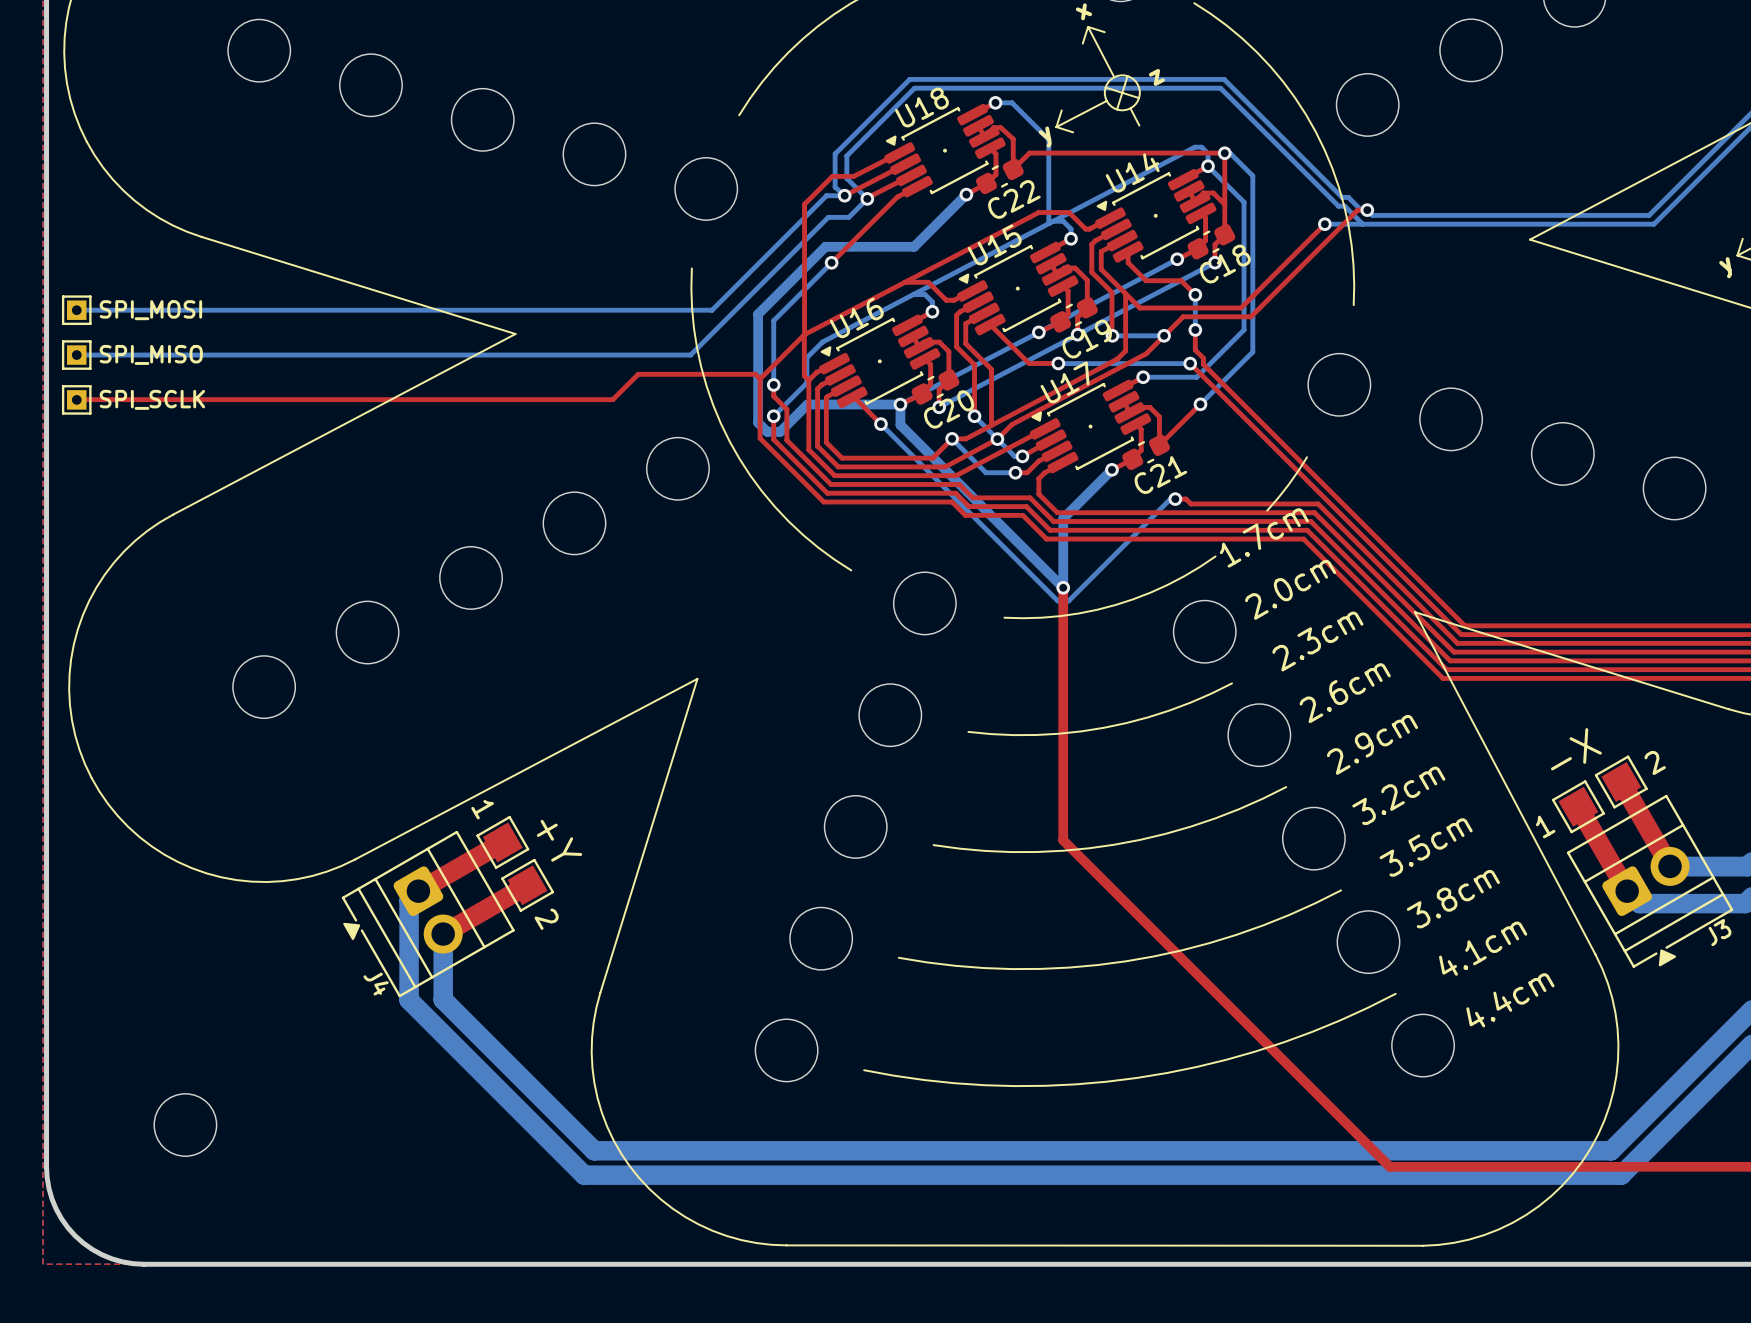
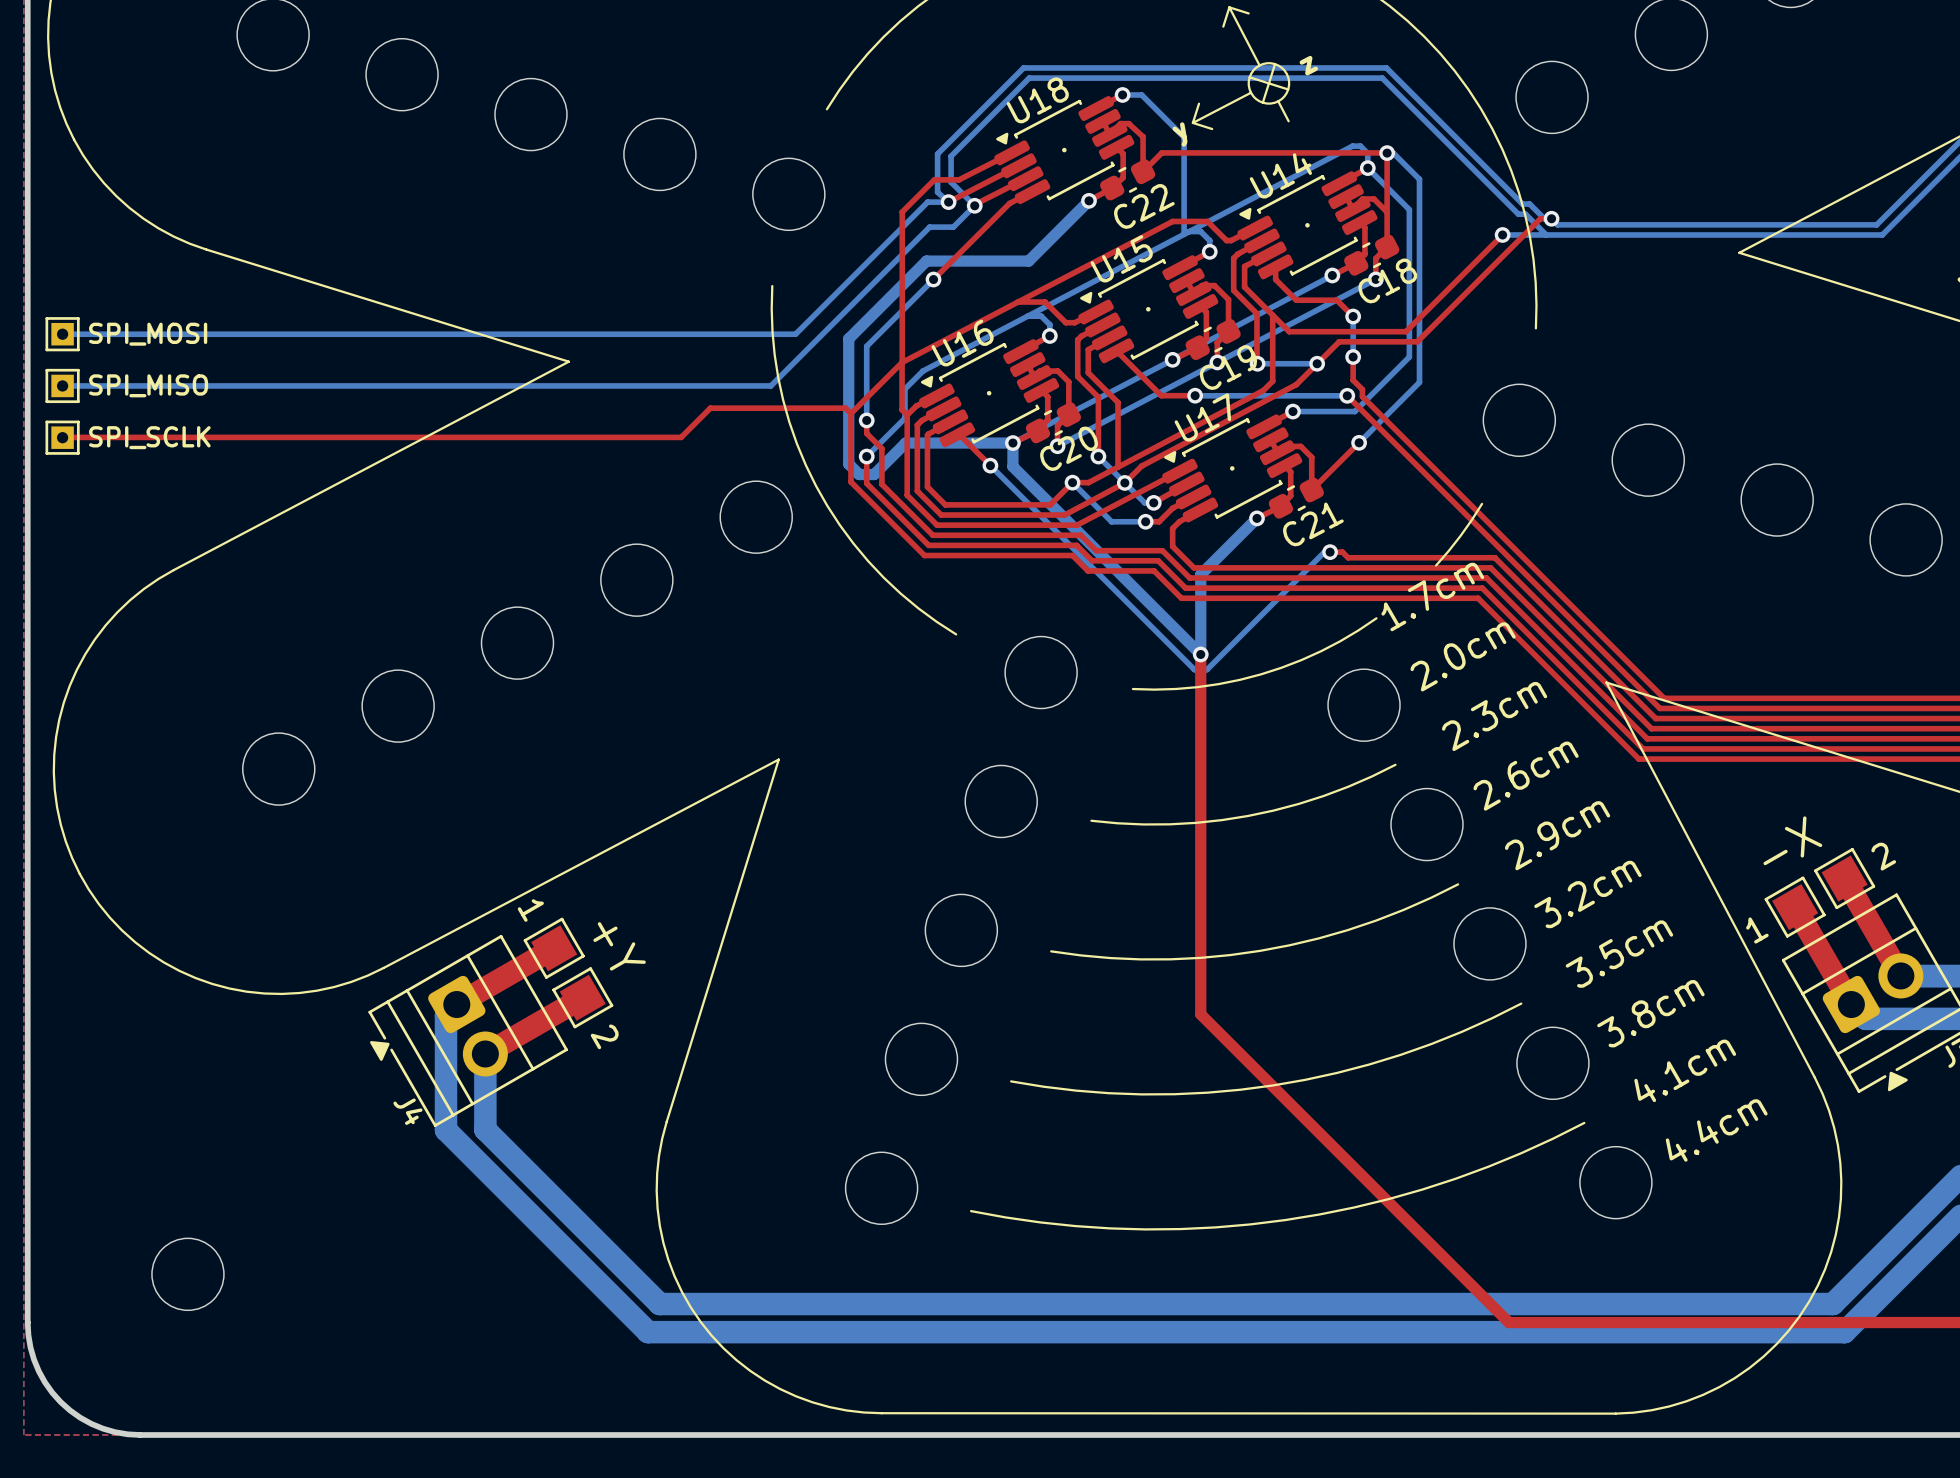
top track: (1063, 840) (1389, 1166) -> (1200, 945) (1200, 1014) (1508, 1322) (1577, 1322)

